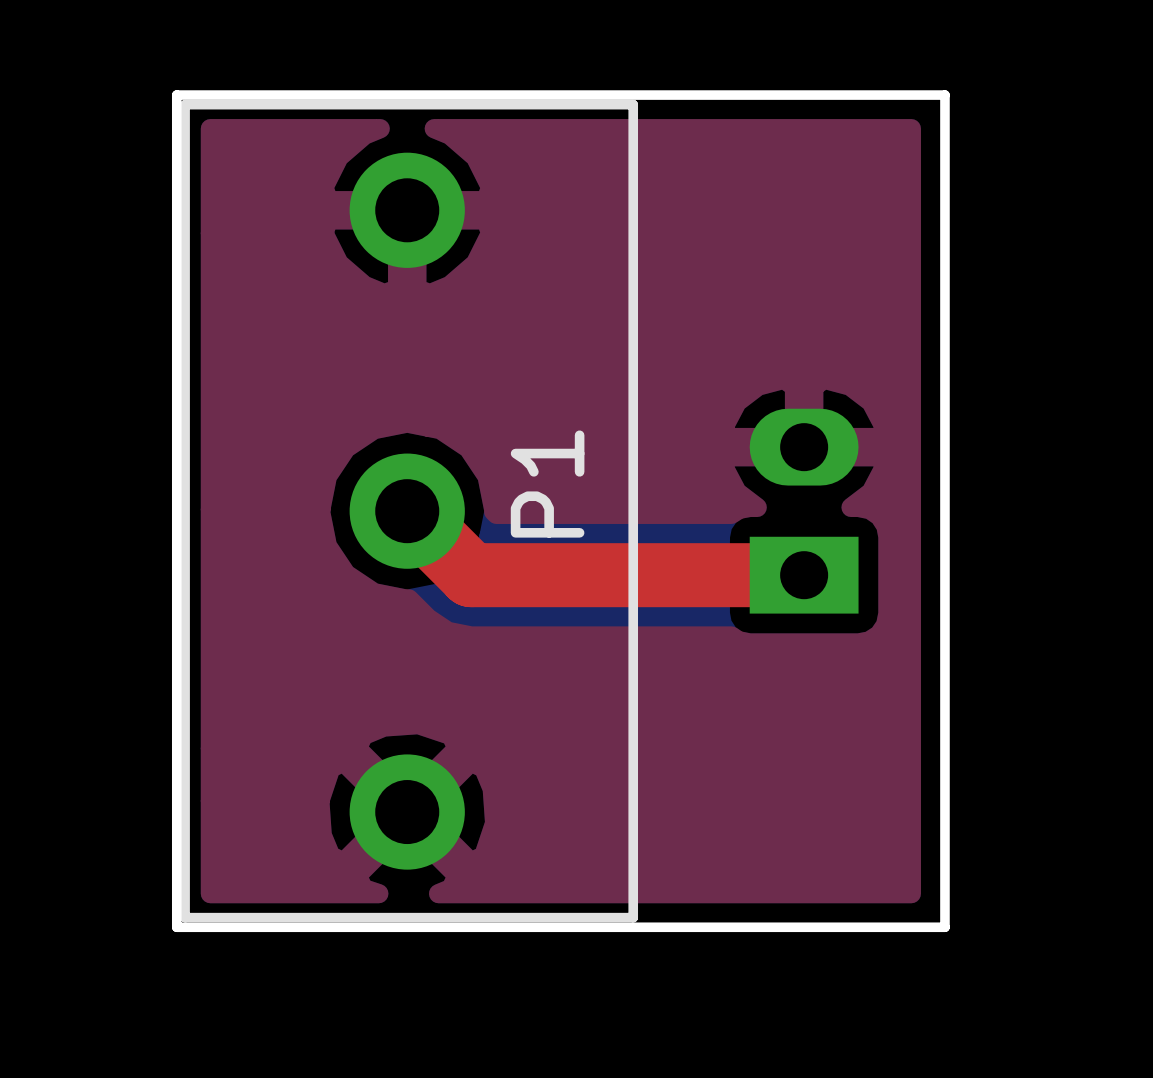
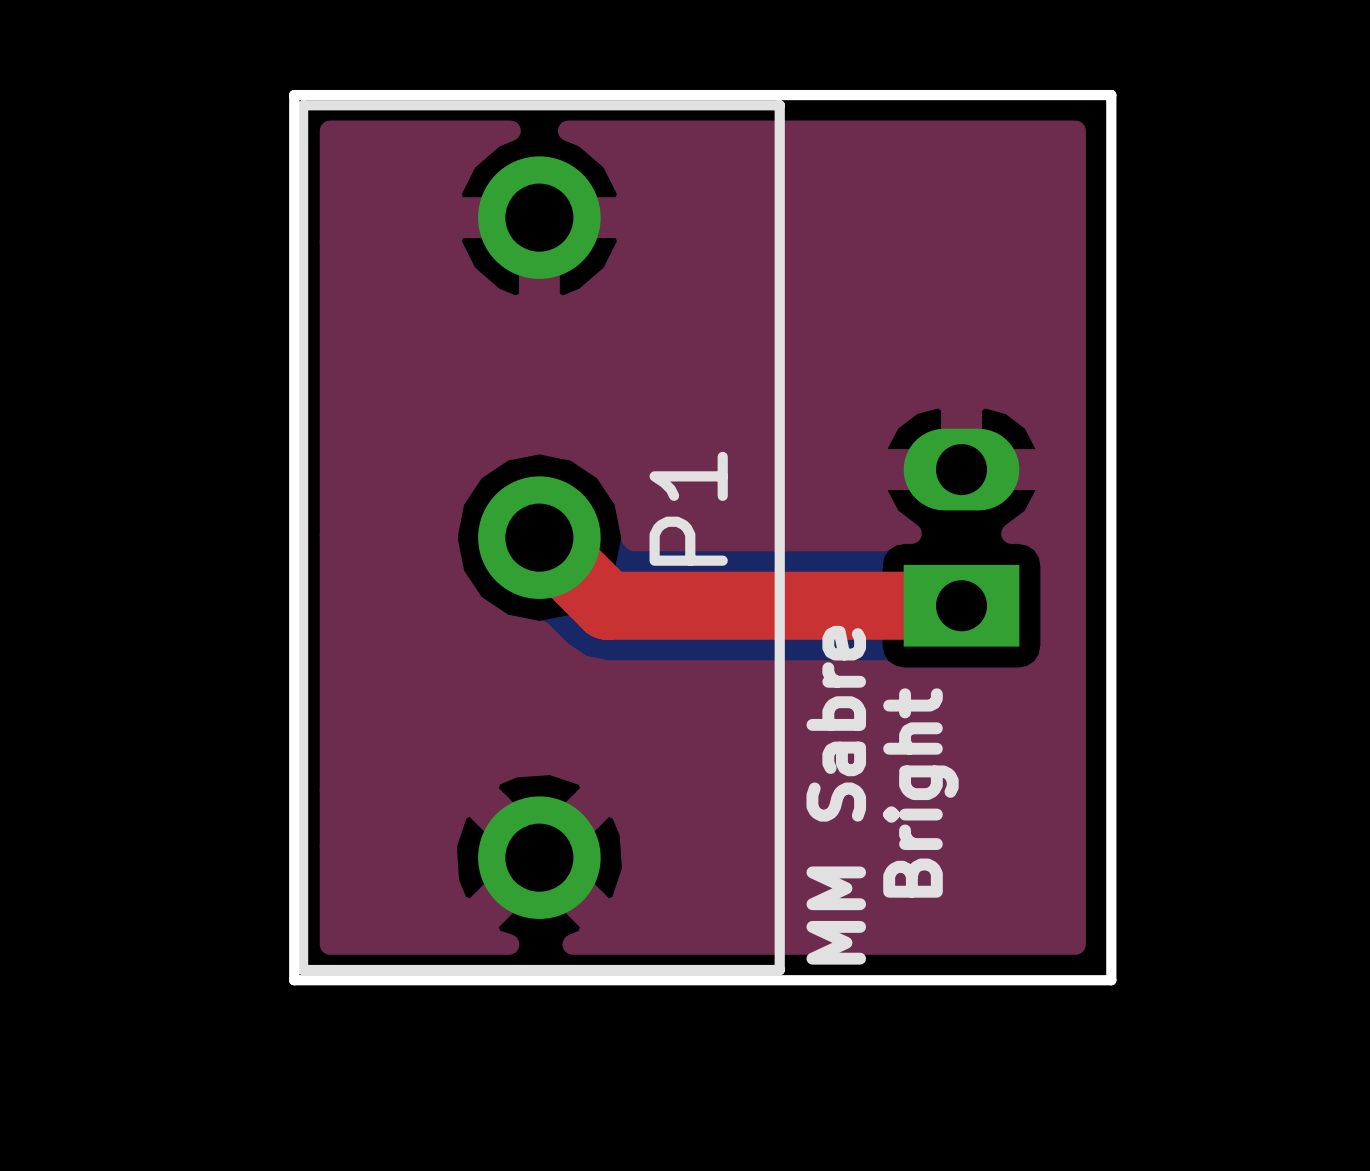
text: none -> Bright (920, 792)
text: none -> MM Sabre (836, 795)

